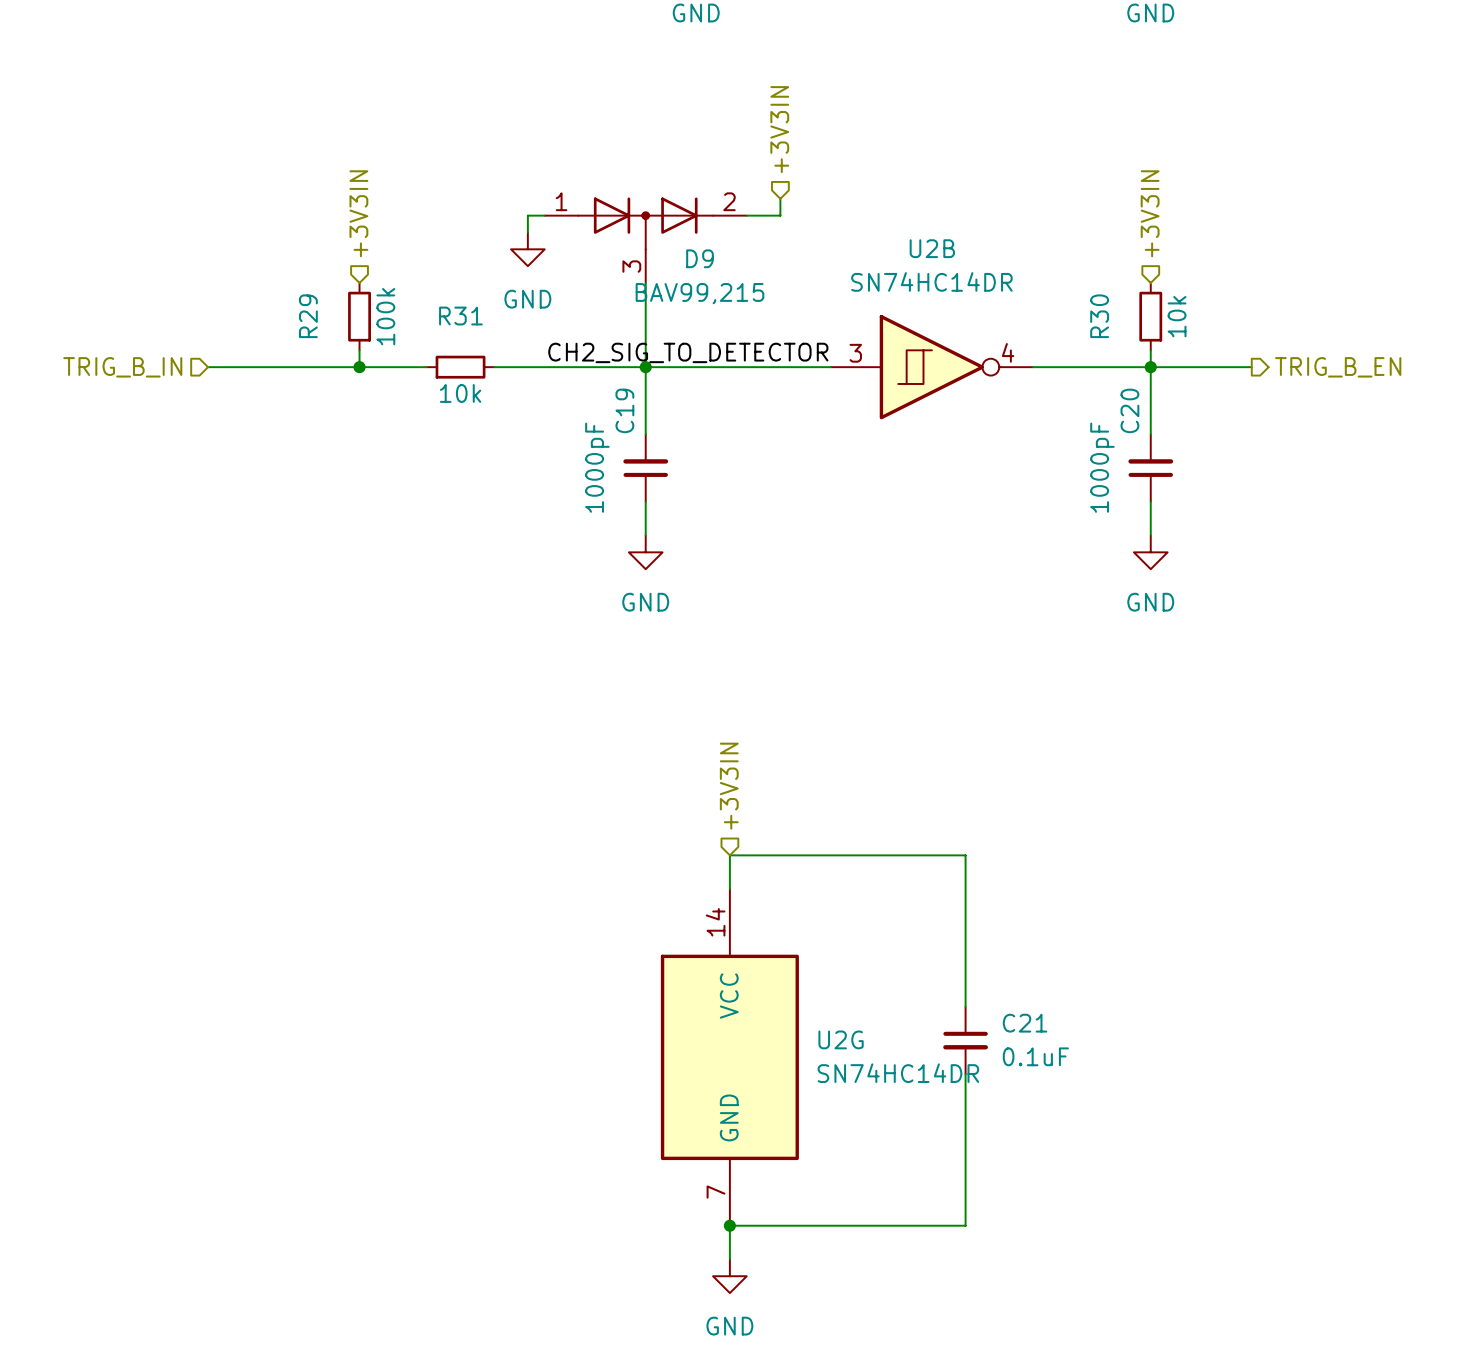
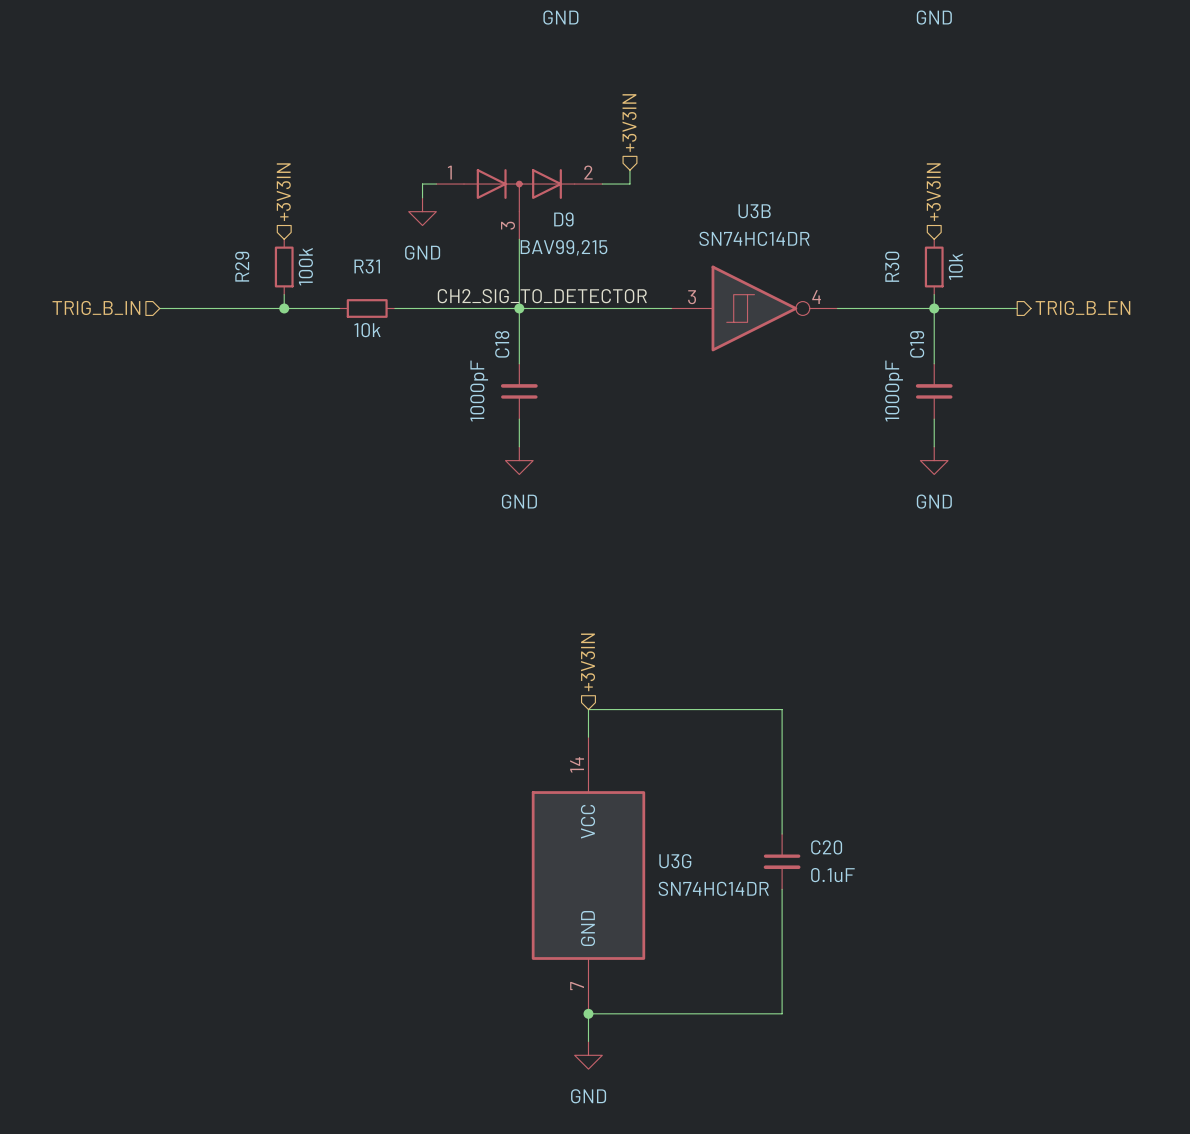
U2B name: U2B (932, 248) -> U3B (754, 211)
C19 name: C19 (624, 410) -> C18 (502, 344)
C20 name: C20 (1129, 410) -> C19 (917, 344)
C21 name: C21 (1025, 1023) -> C20 (826, 847)
U2G name: U2G (841, 1039) -> U3G (675, 861)

